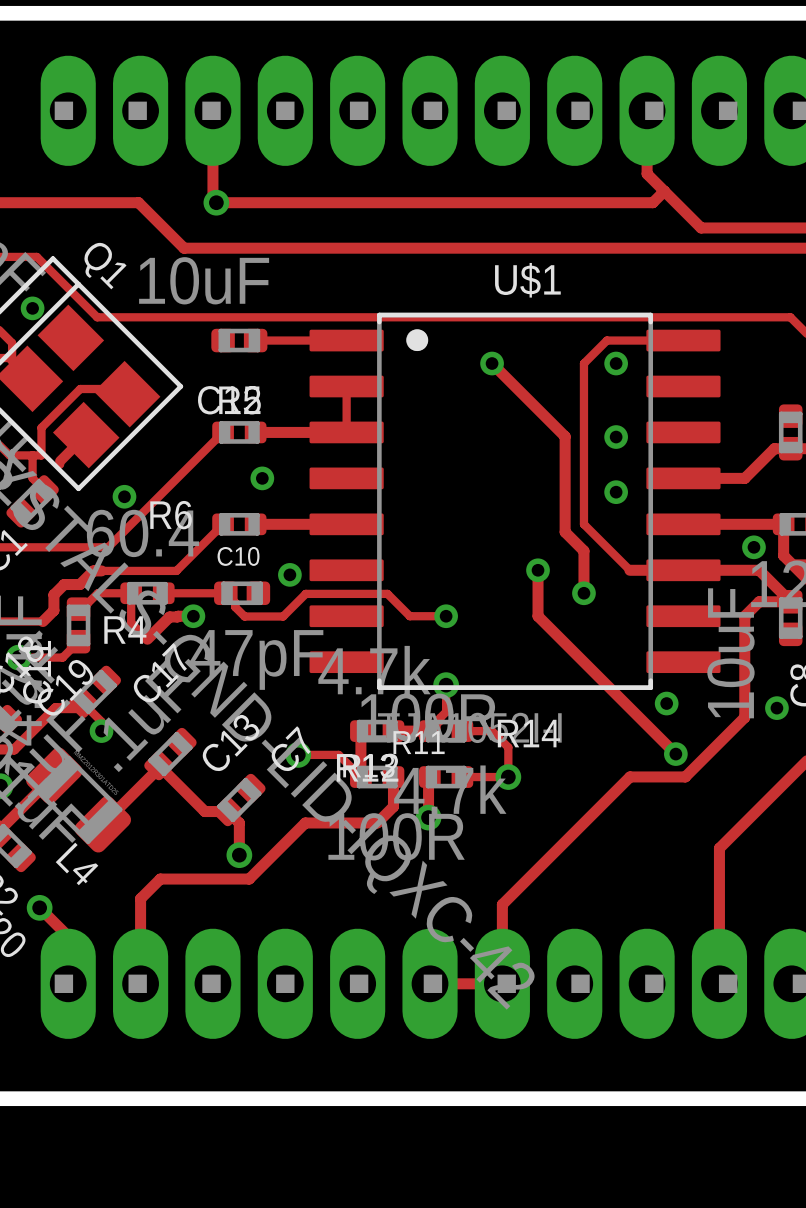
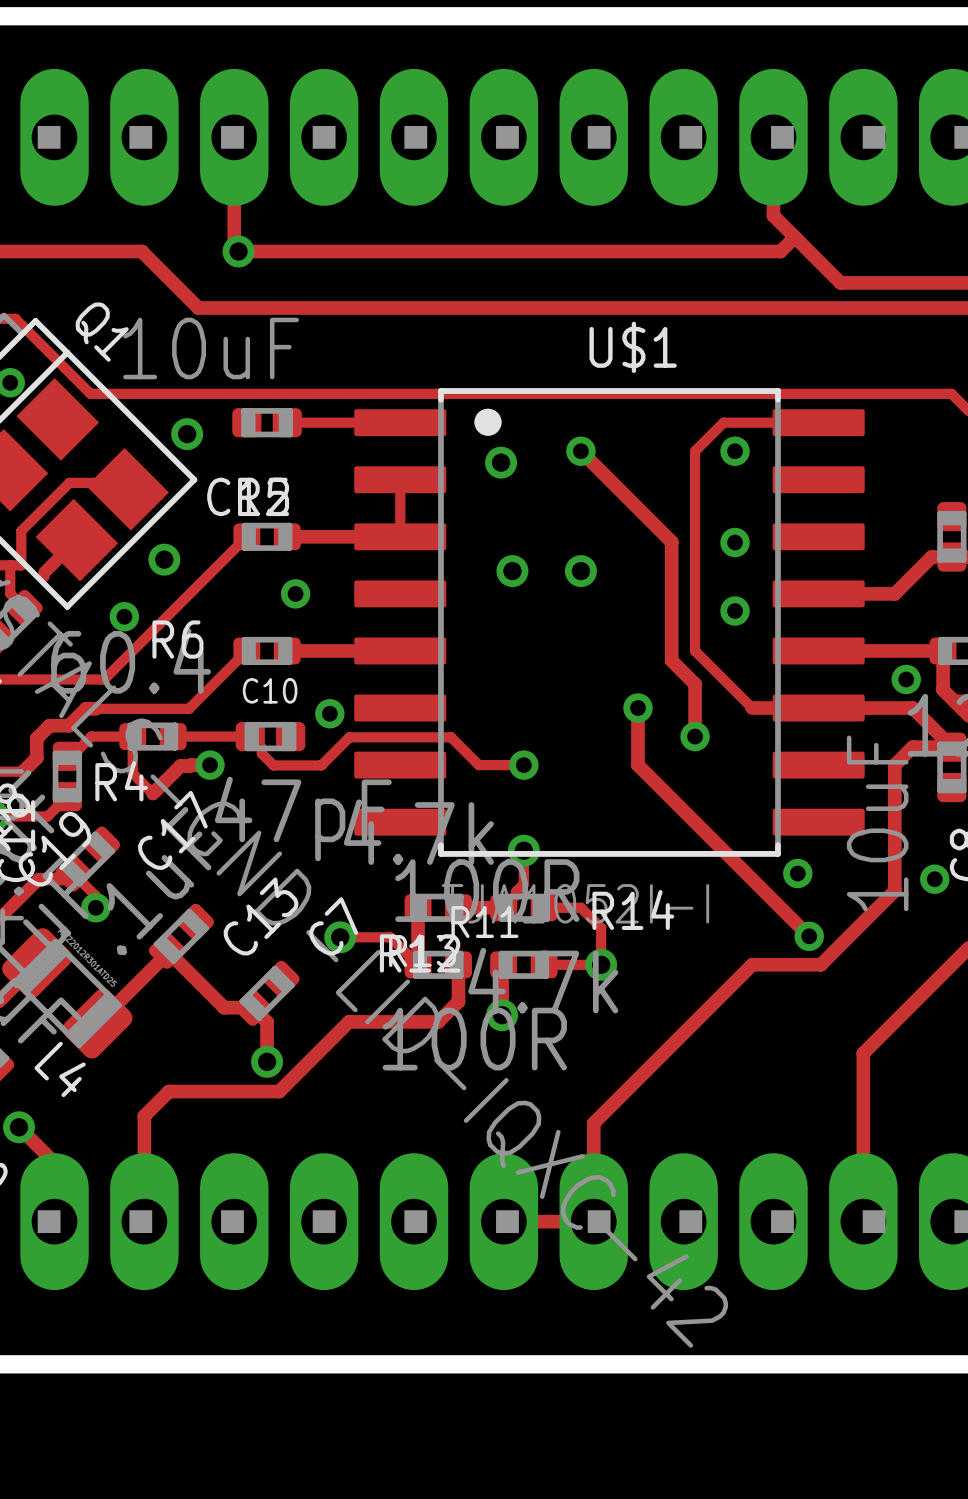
via: none -> (187, 434)
via: none -> (501, 462)
via: none -> (164, 559)
via: none -> (512, 571)
via: none -> (580, 571)

